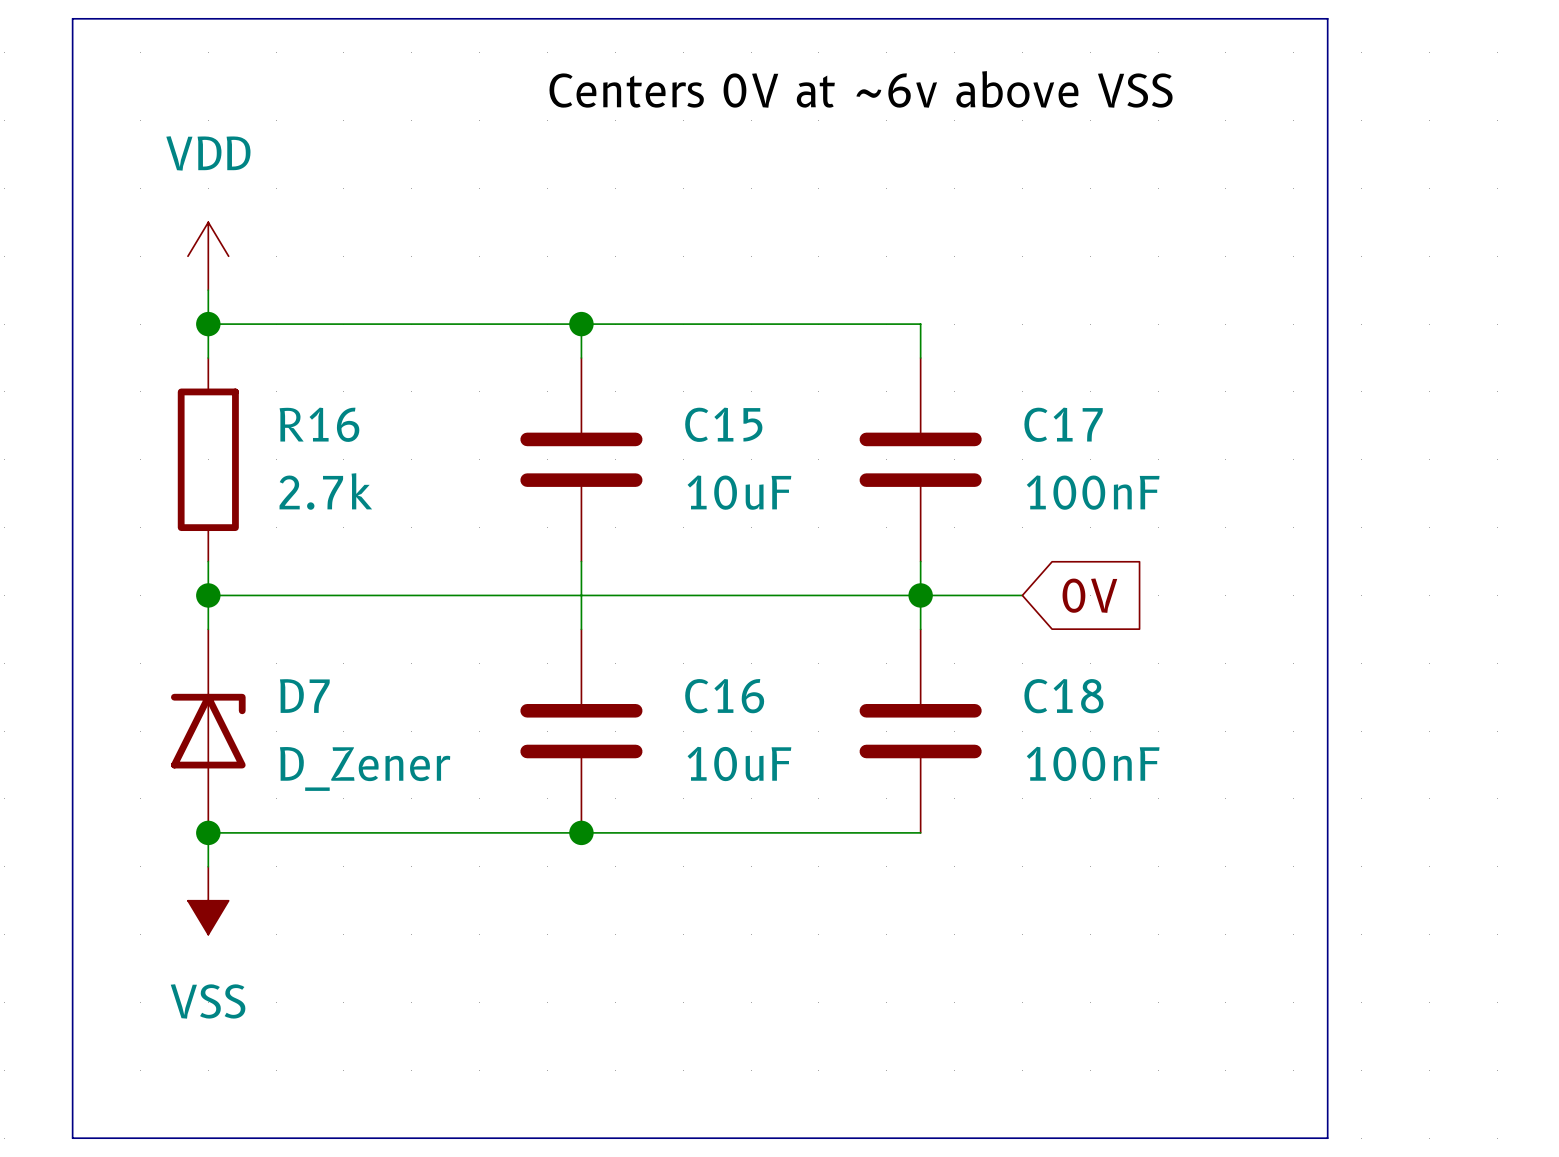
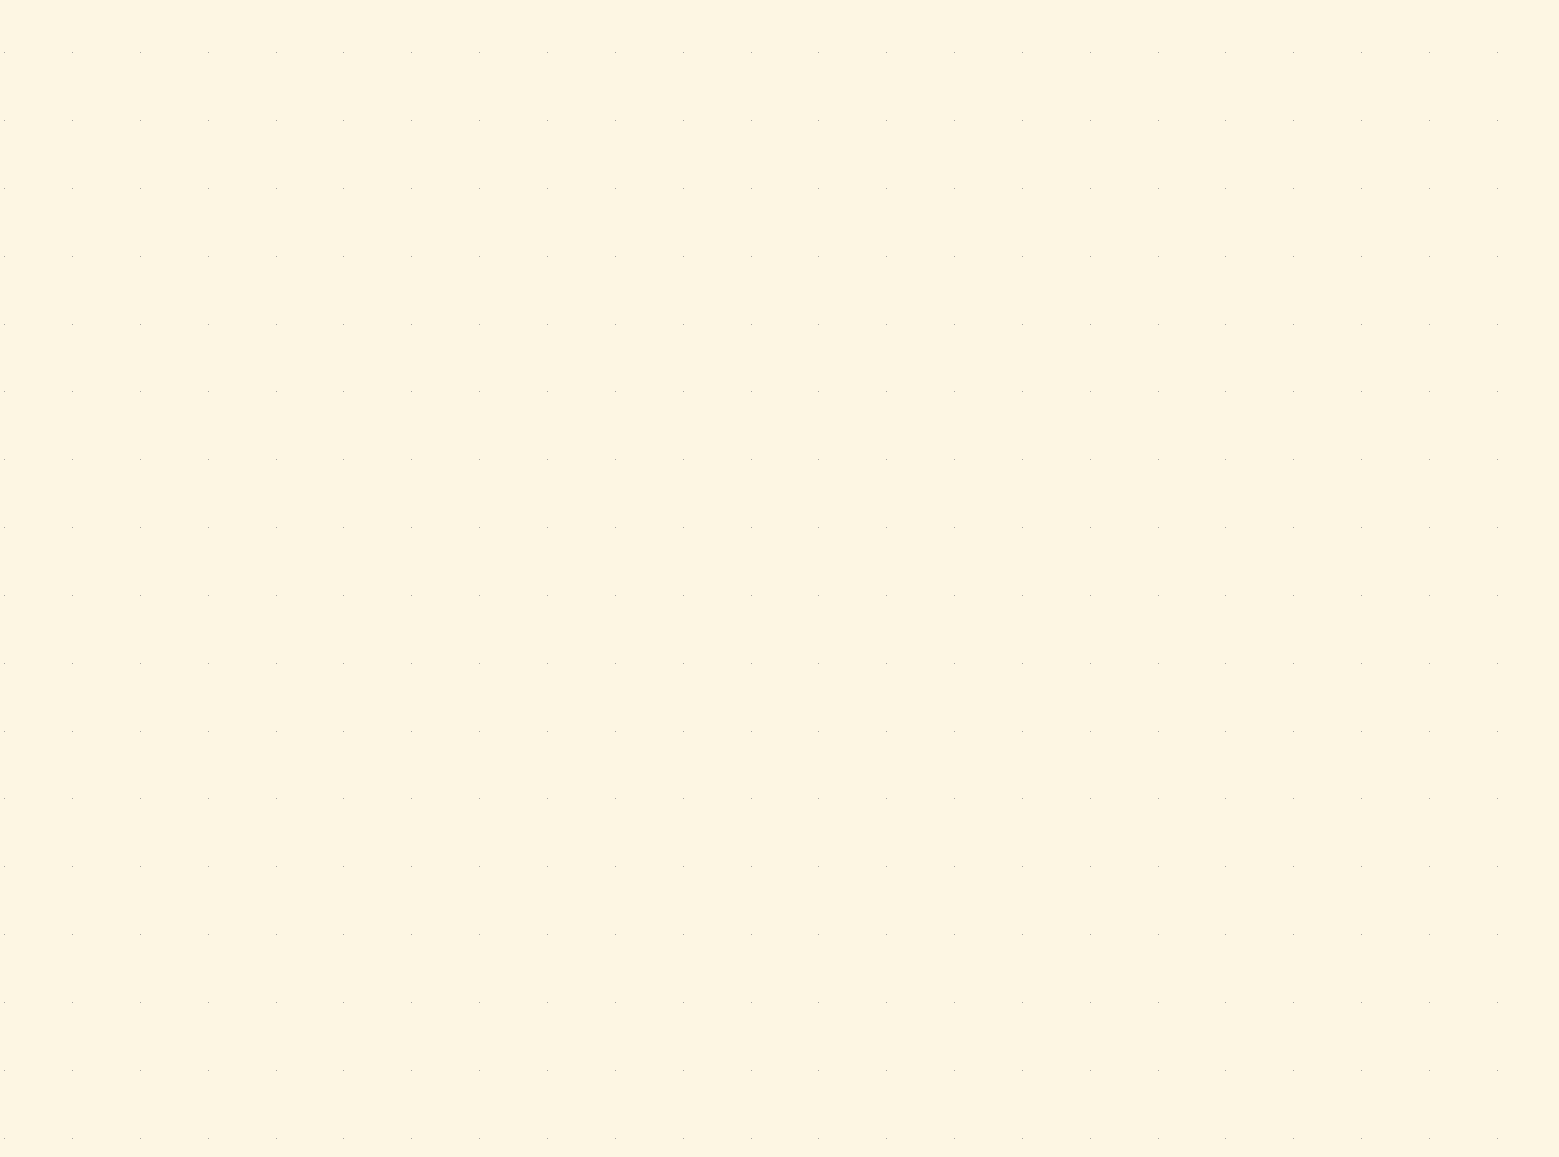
line: (72, 18) (1327, 18) (1327, 1138) (72, 1138) (72, 18) -> none
label: Centers 0V at ~6v above VSS (861, 89) -> none
power symbol: VDD (208, 256) -> none
wire: (208, 290) (208, 358) -> none
wire: (208, 324) (920, 324) (920, 358) -> none
junction: (208, 324) -> none
wire: (581, 324) (581, 358) -> none
junction: (581, 324) -> none
R16: 2.7k (208, 459) -> none
C15: 10uF (581, 459) -> none
C17: 100nF (920, 459) -> none
wire: (208, 561) (208, 629) -> none
wire: (581, 561) (581, 629) -> none
wire: (920, 561) (920, 629) -> none
wire: (208, 595) (1022, 595) -> none
junction: (208, 595) -> none
junction: (920, 595) -> none
global label: 0V (1089, 595) -> none
D7: D_Zener (208, 731) -> none
C16: 10uF (581, 731) -> none
C18: 100nF (920, 731) -> none
junction: (208, 832) -> none
junction: (581, 832) -> none
wire: (920, 832) (208, 832) (208, 866) -> none
power symbol: VSS (208, 900) -> none

